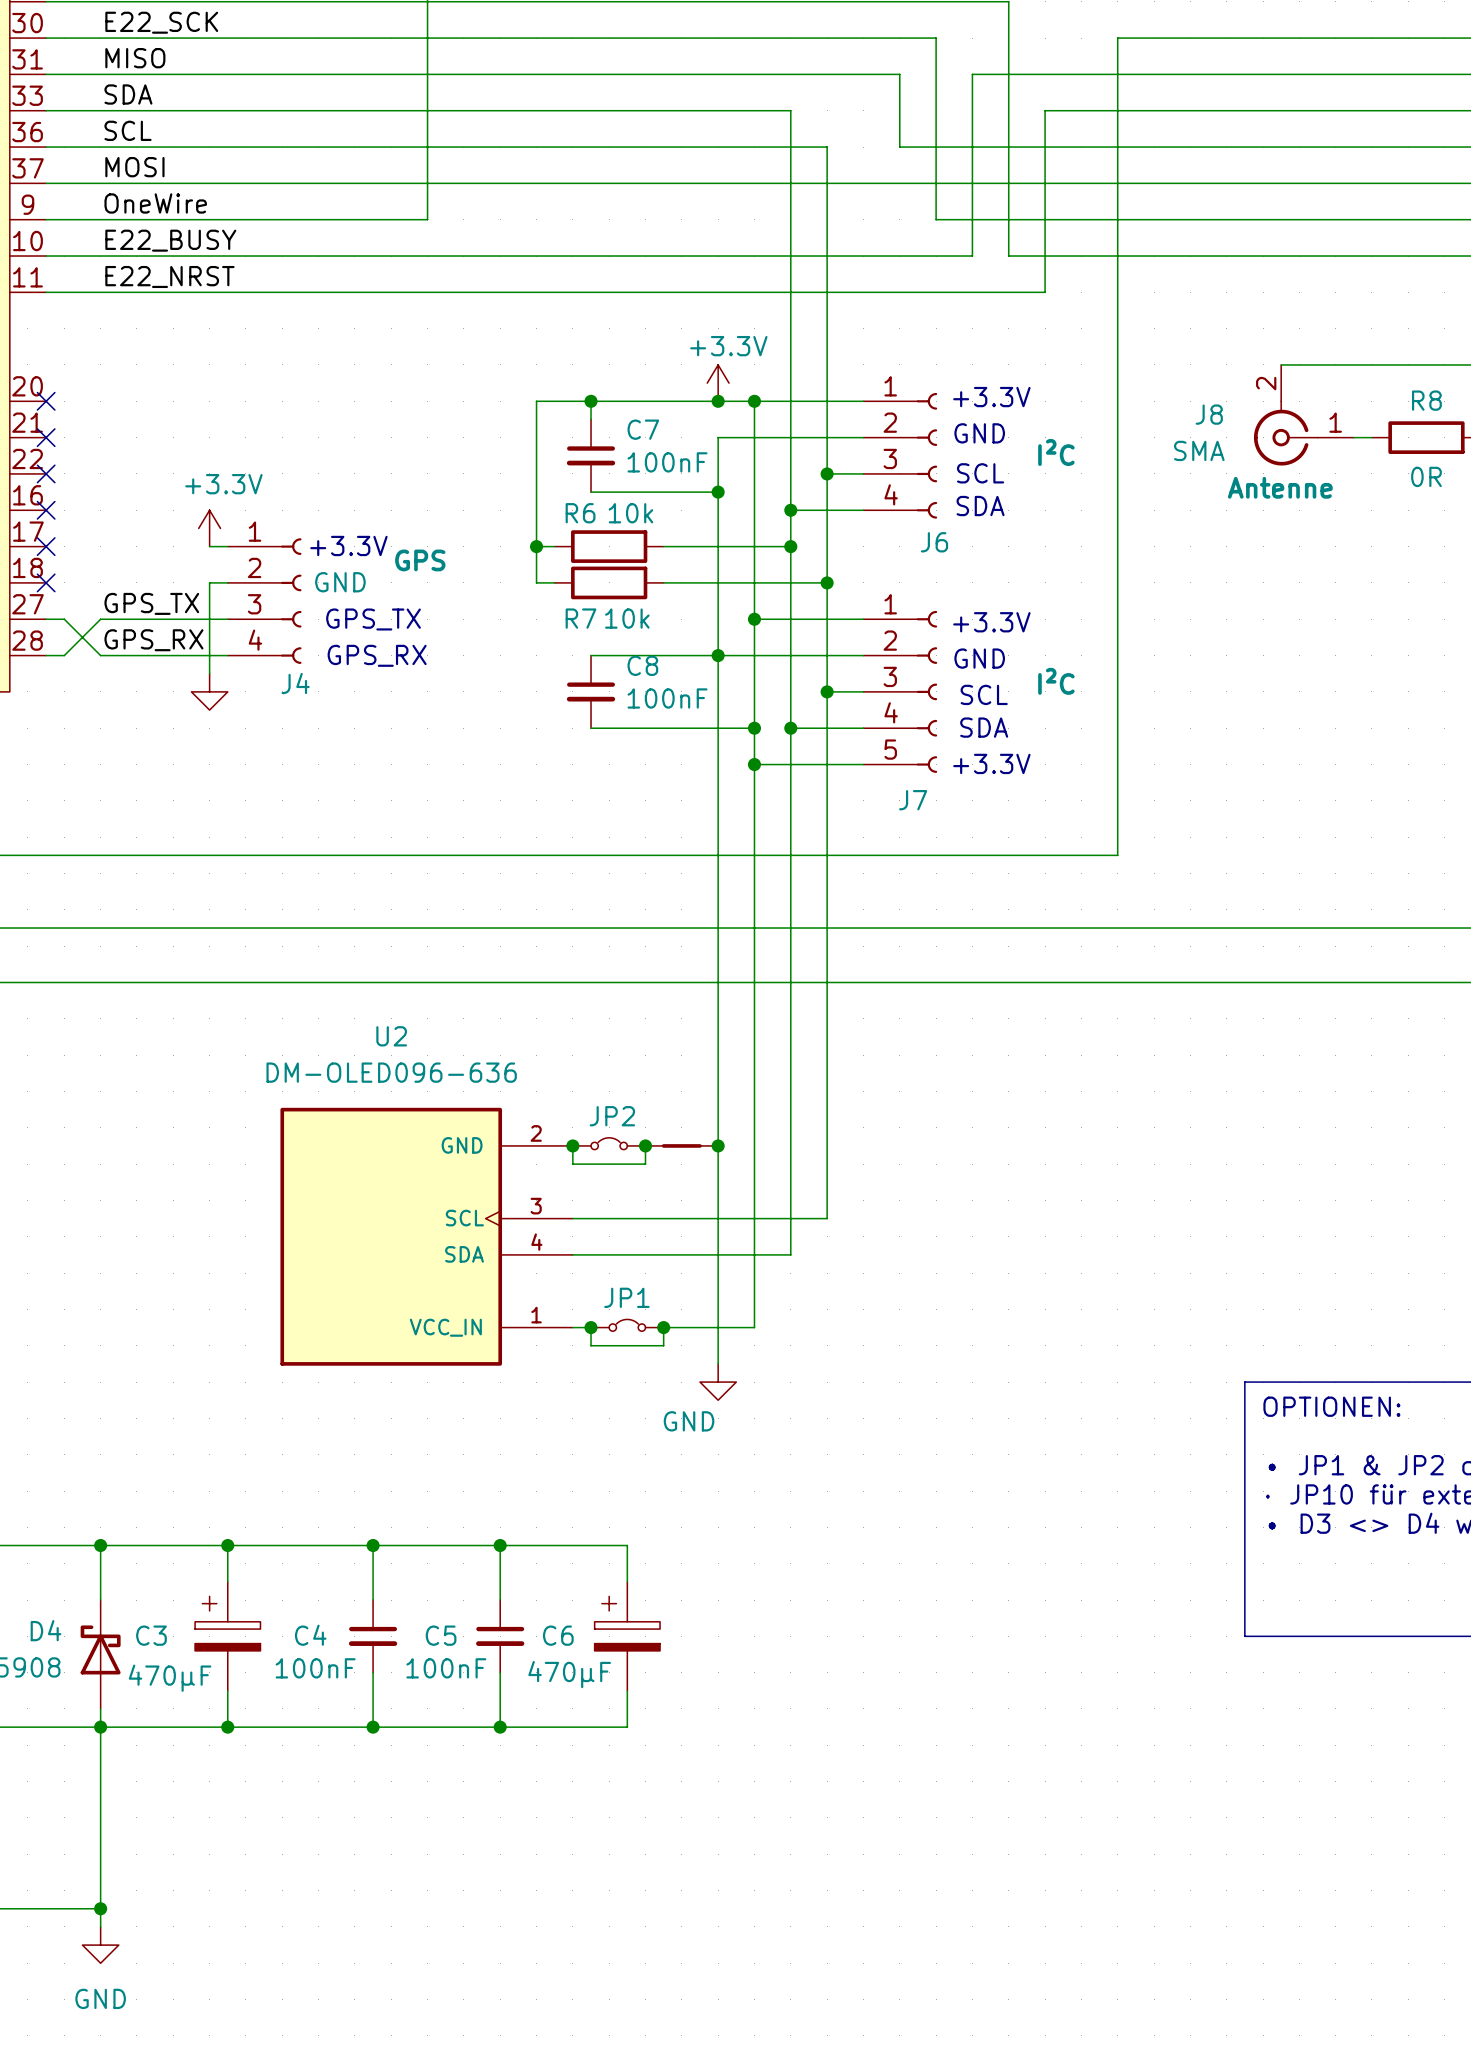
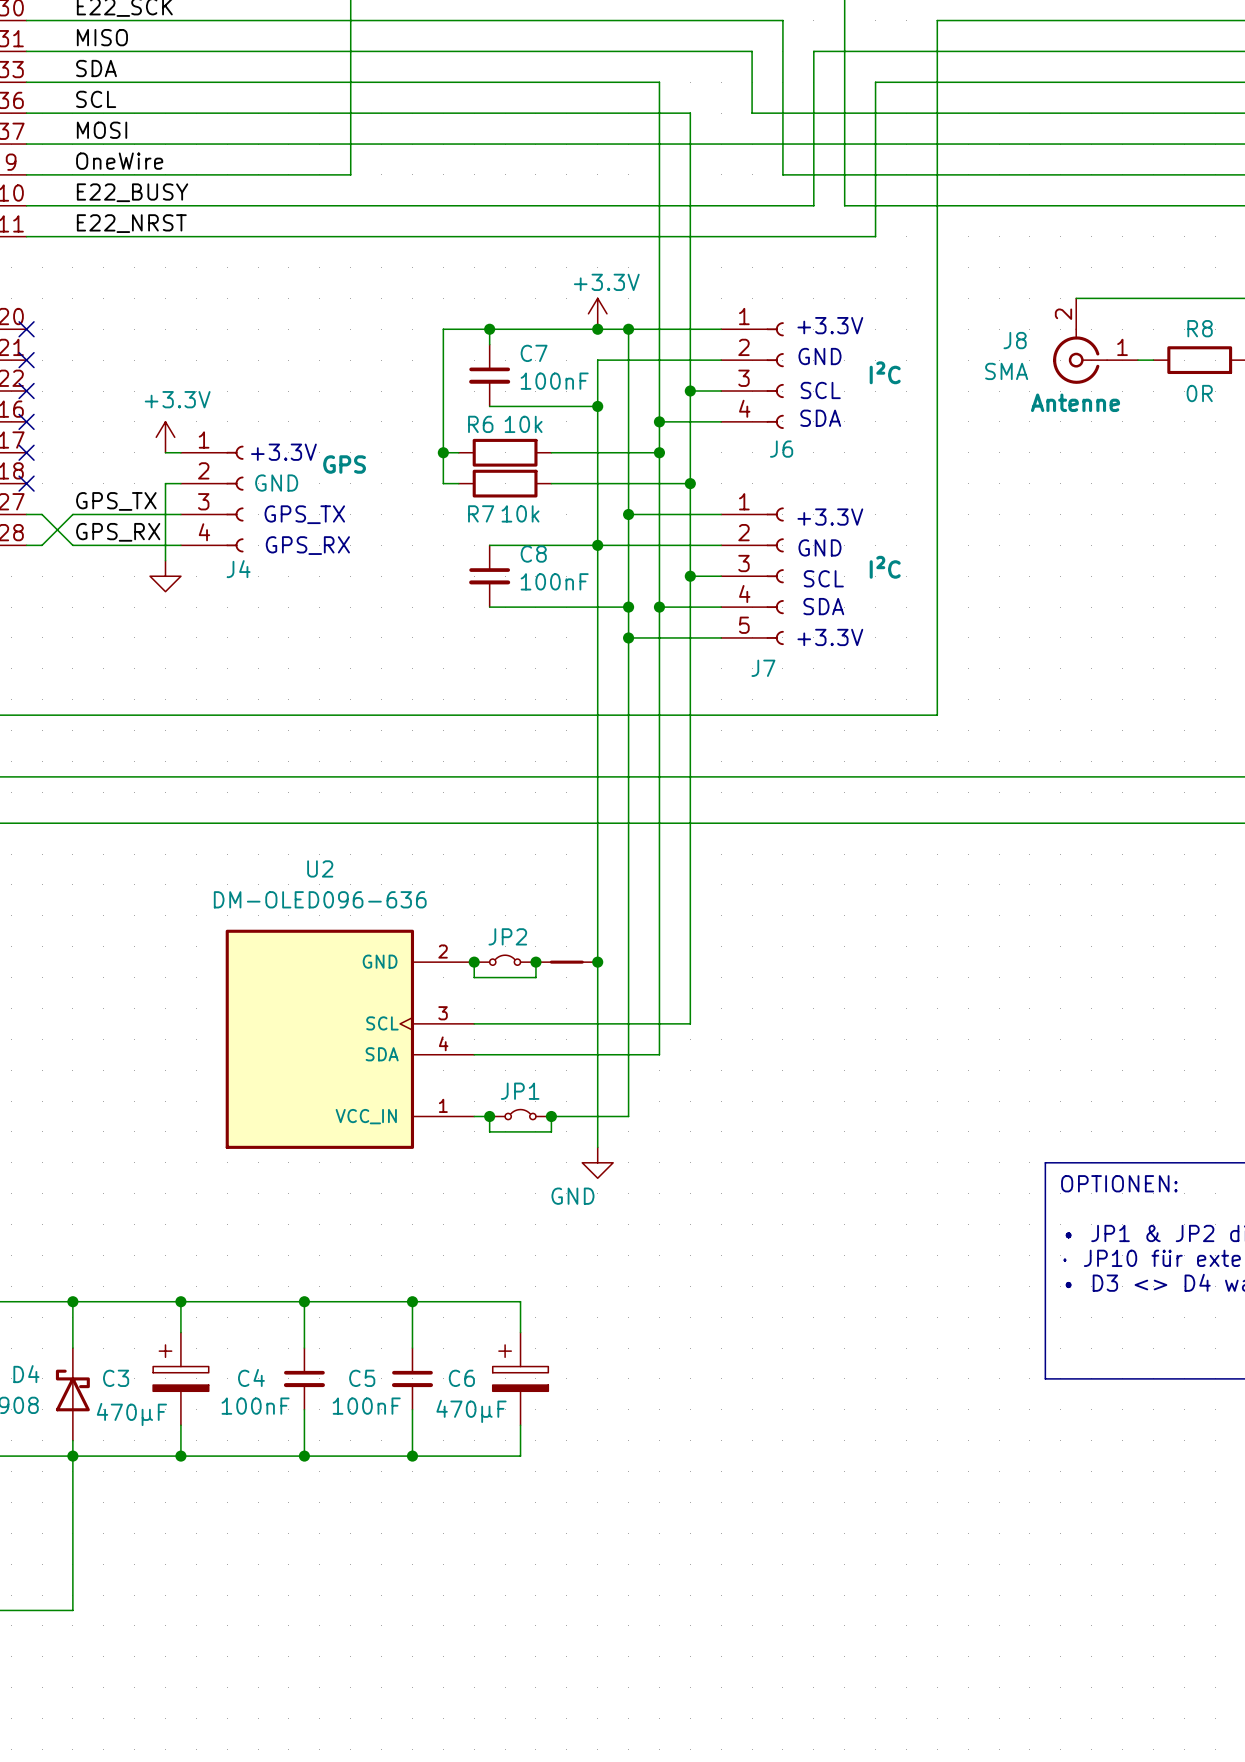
wire: (100, 1908) (100, 1926) -> none
junction: (100, 1908) -> none
power symbol: GND (100, 1945) -> none

